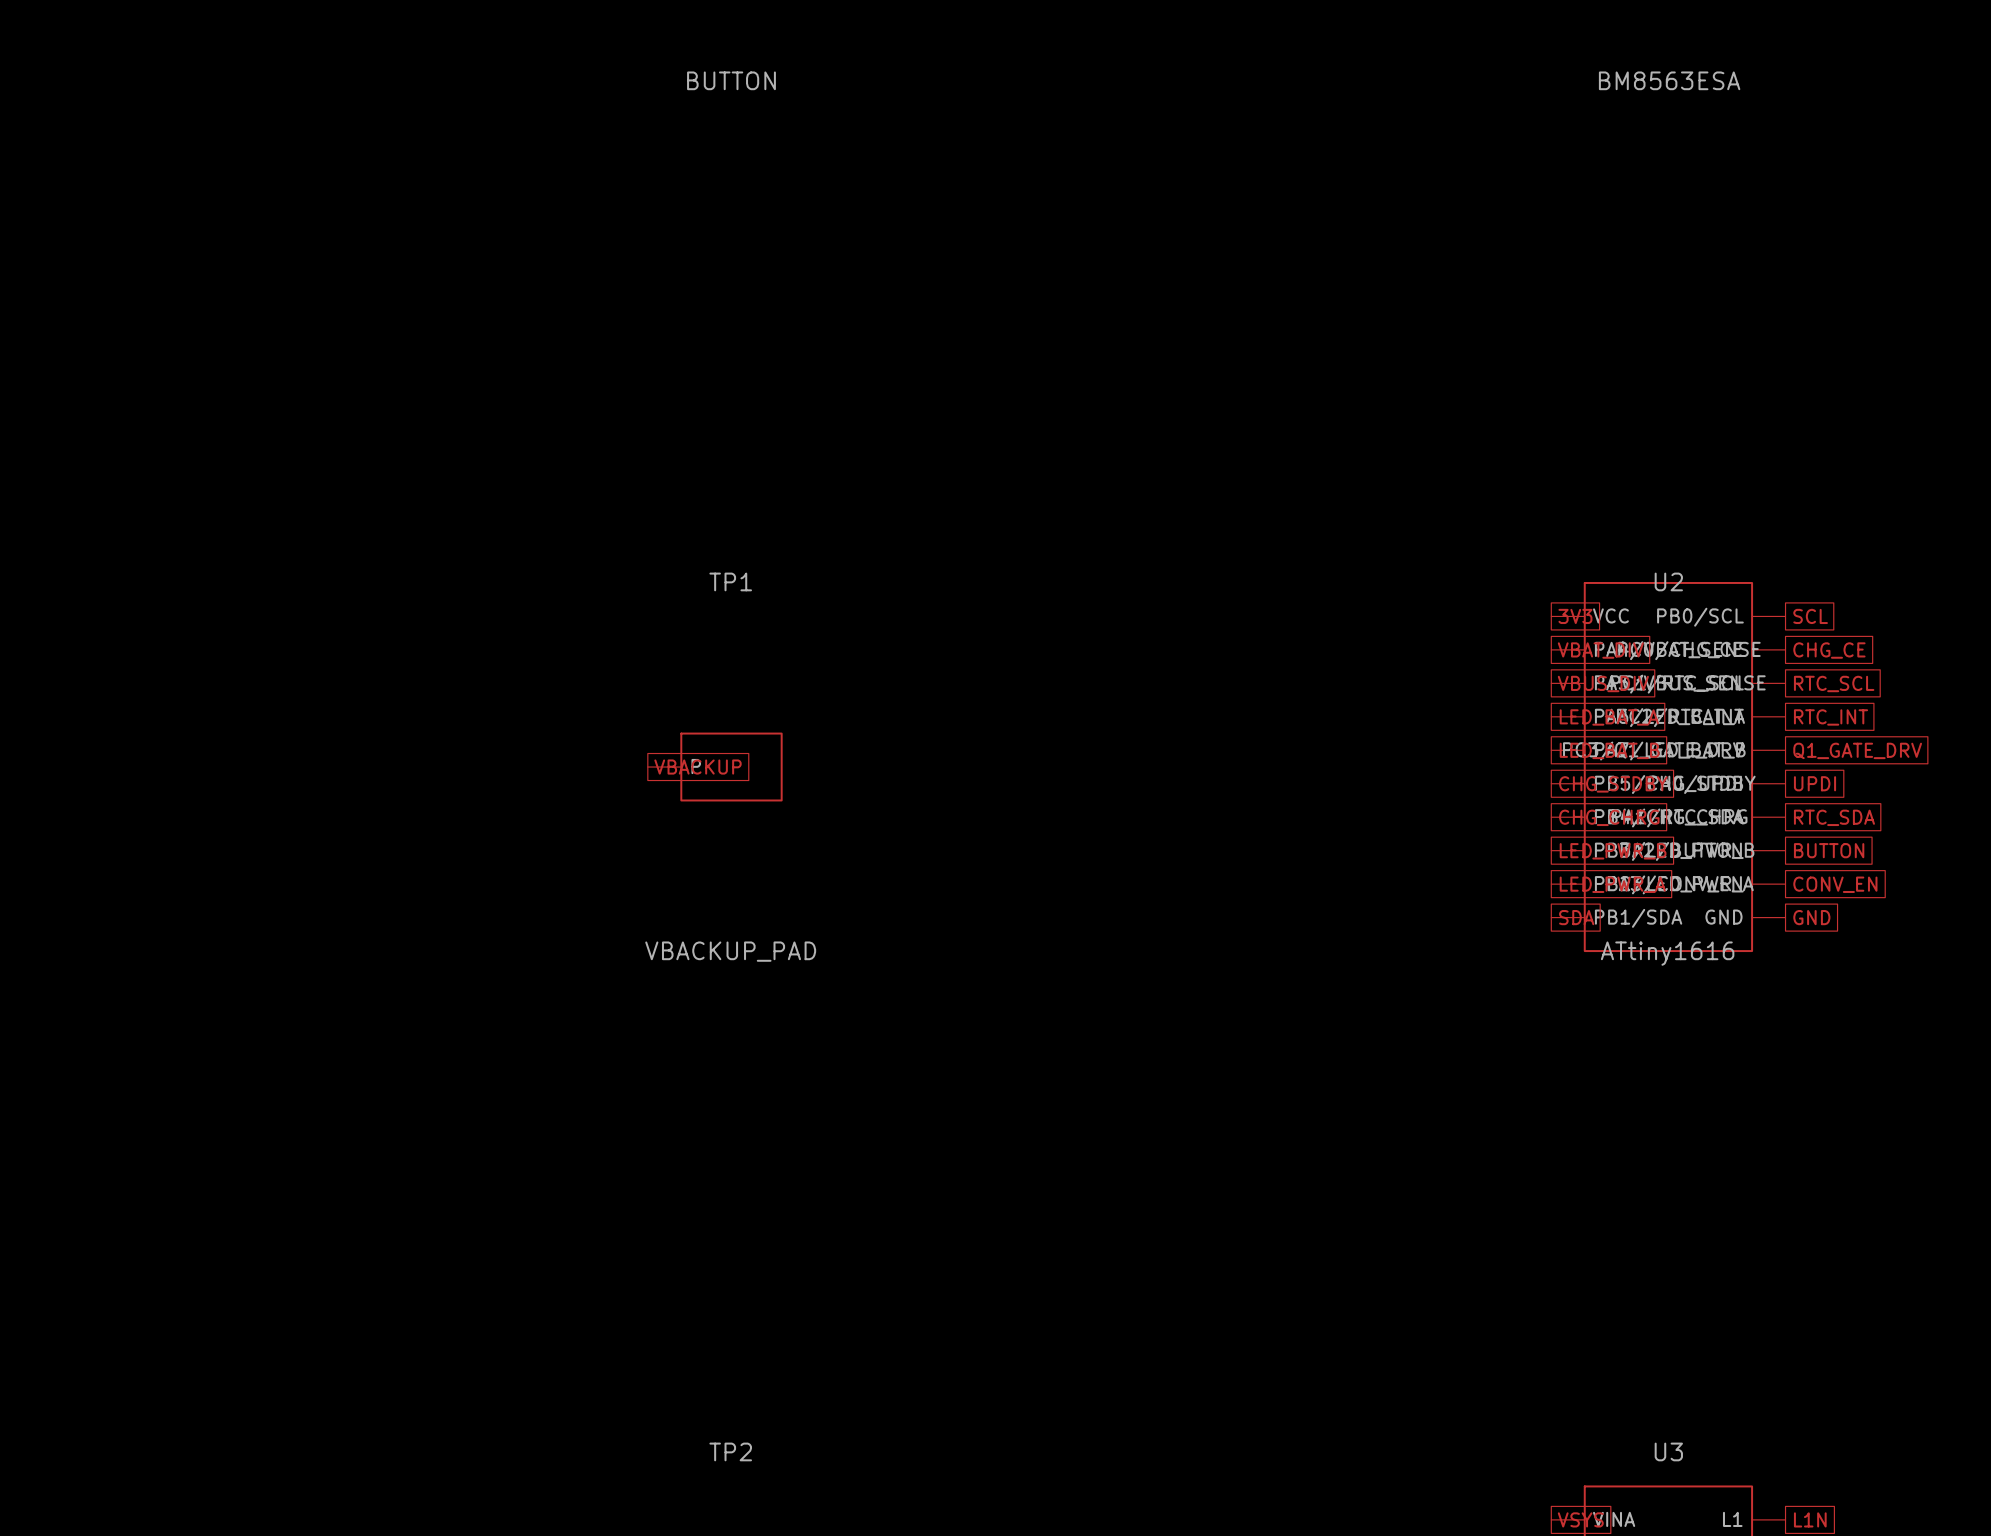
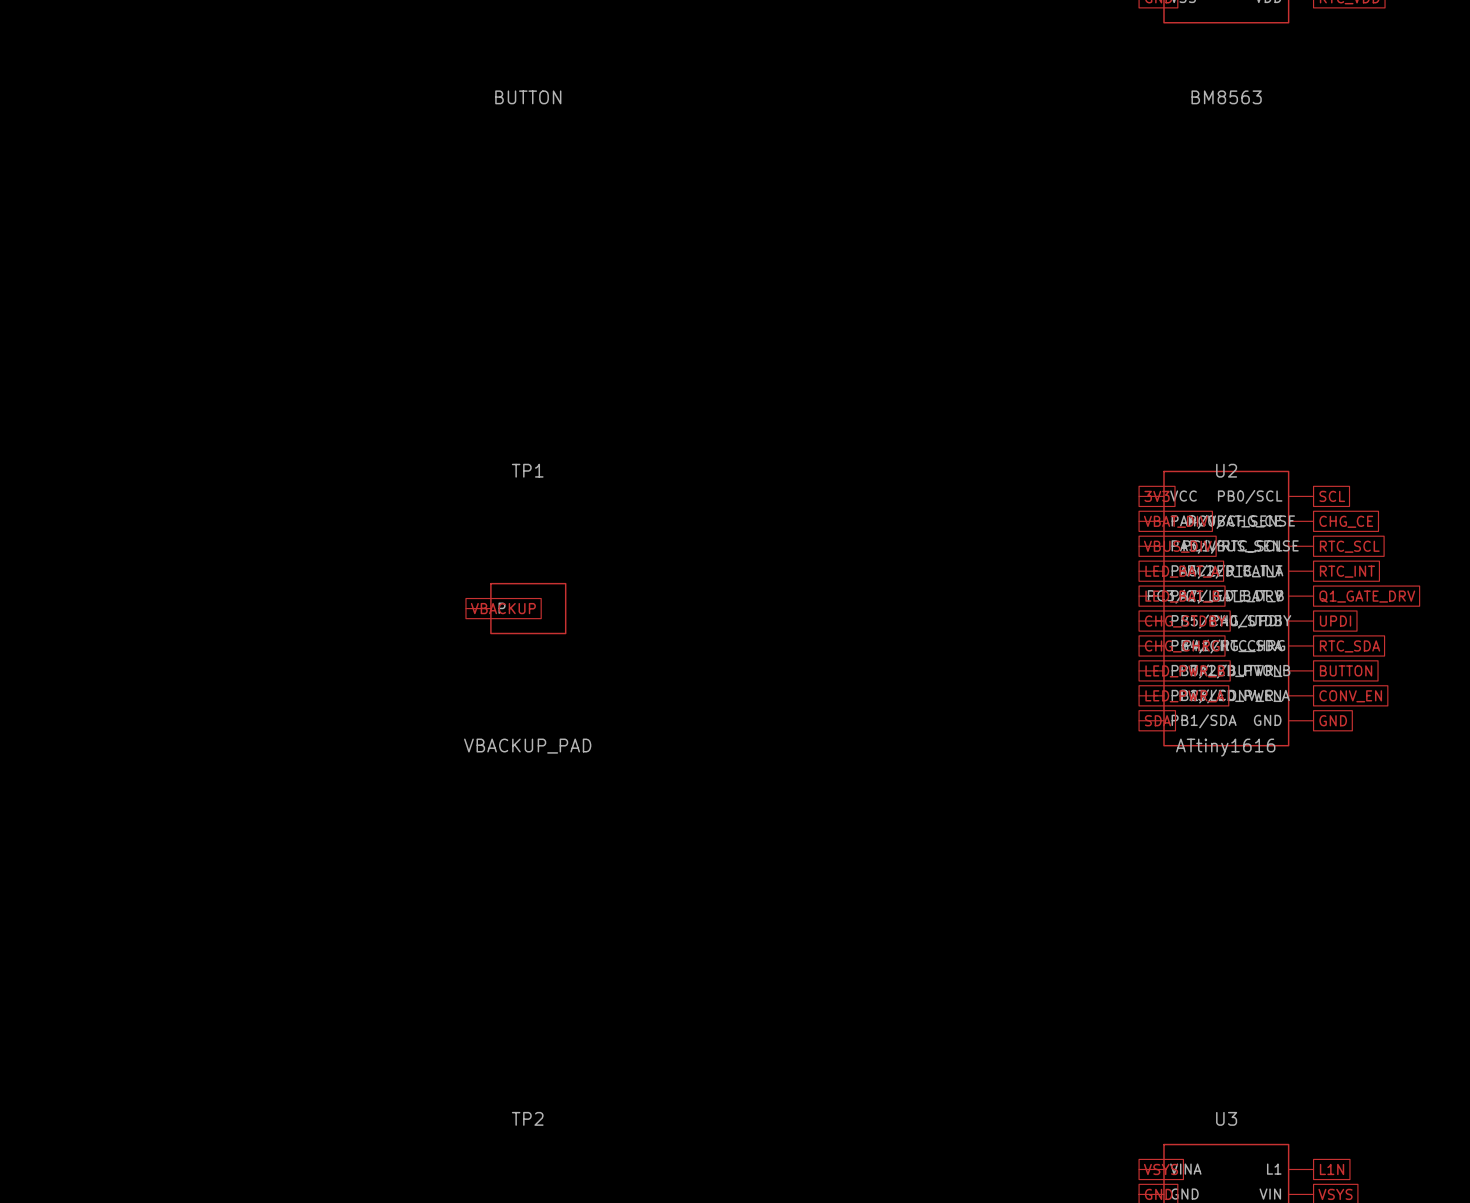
part value: BM8563ESA (1669, 80) -> BM8563 (1226, 97)

